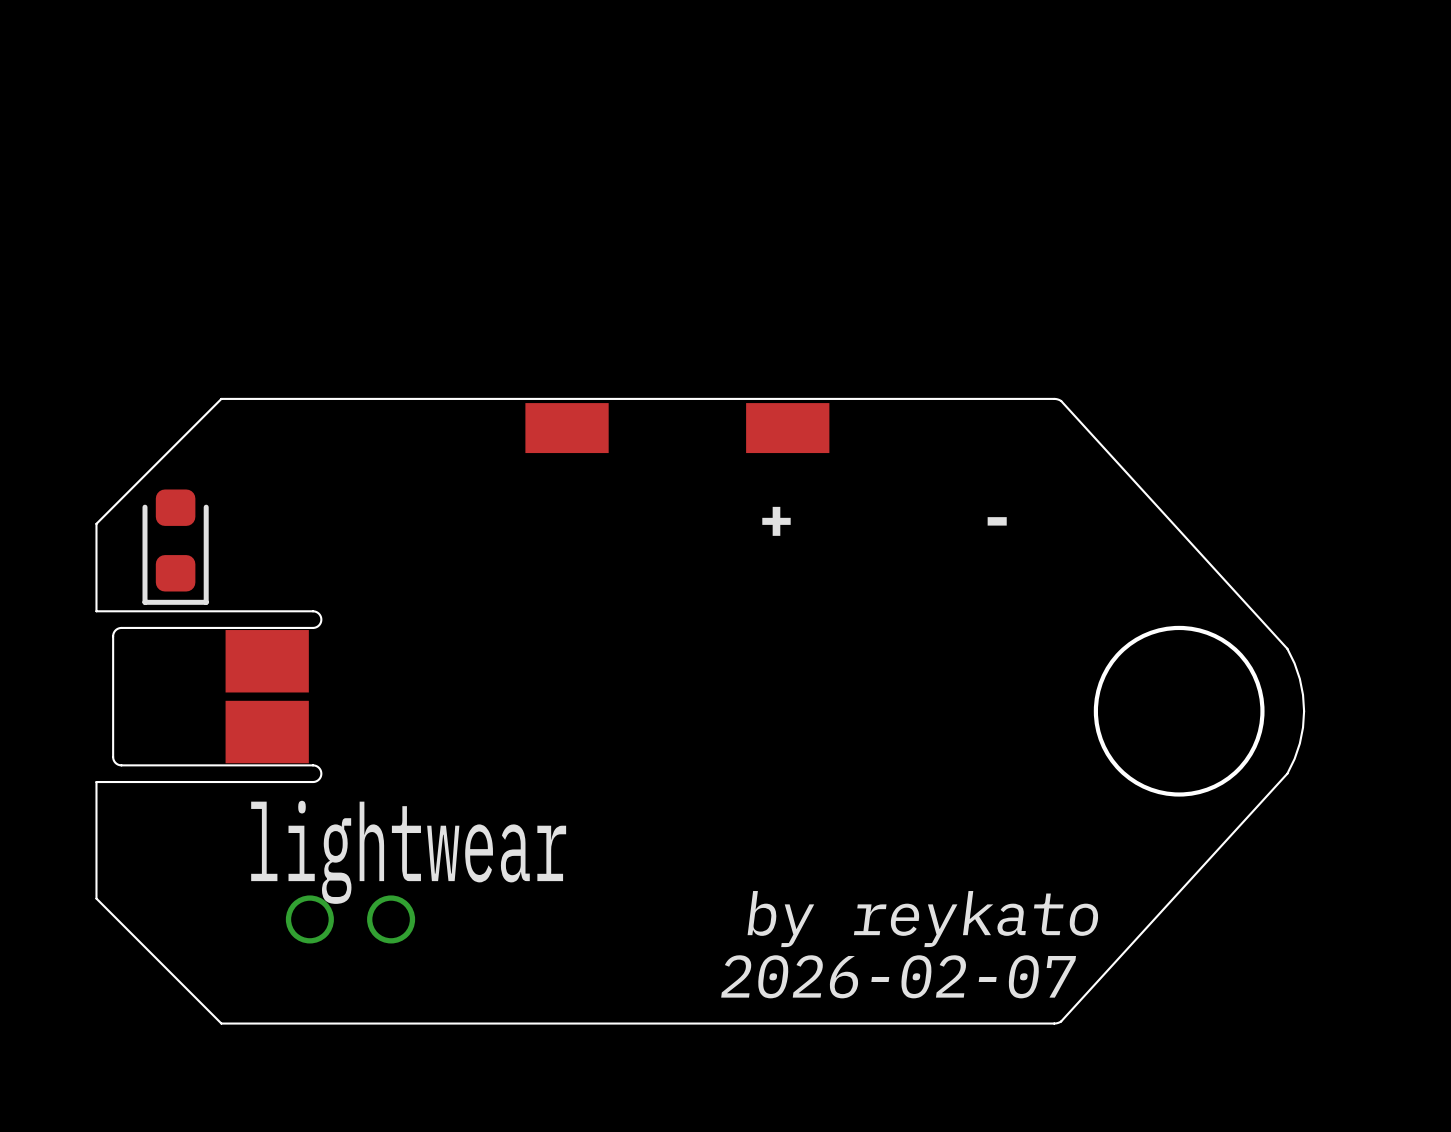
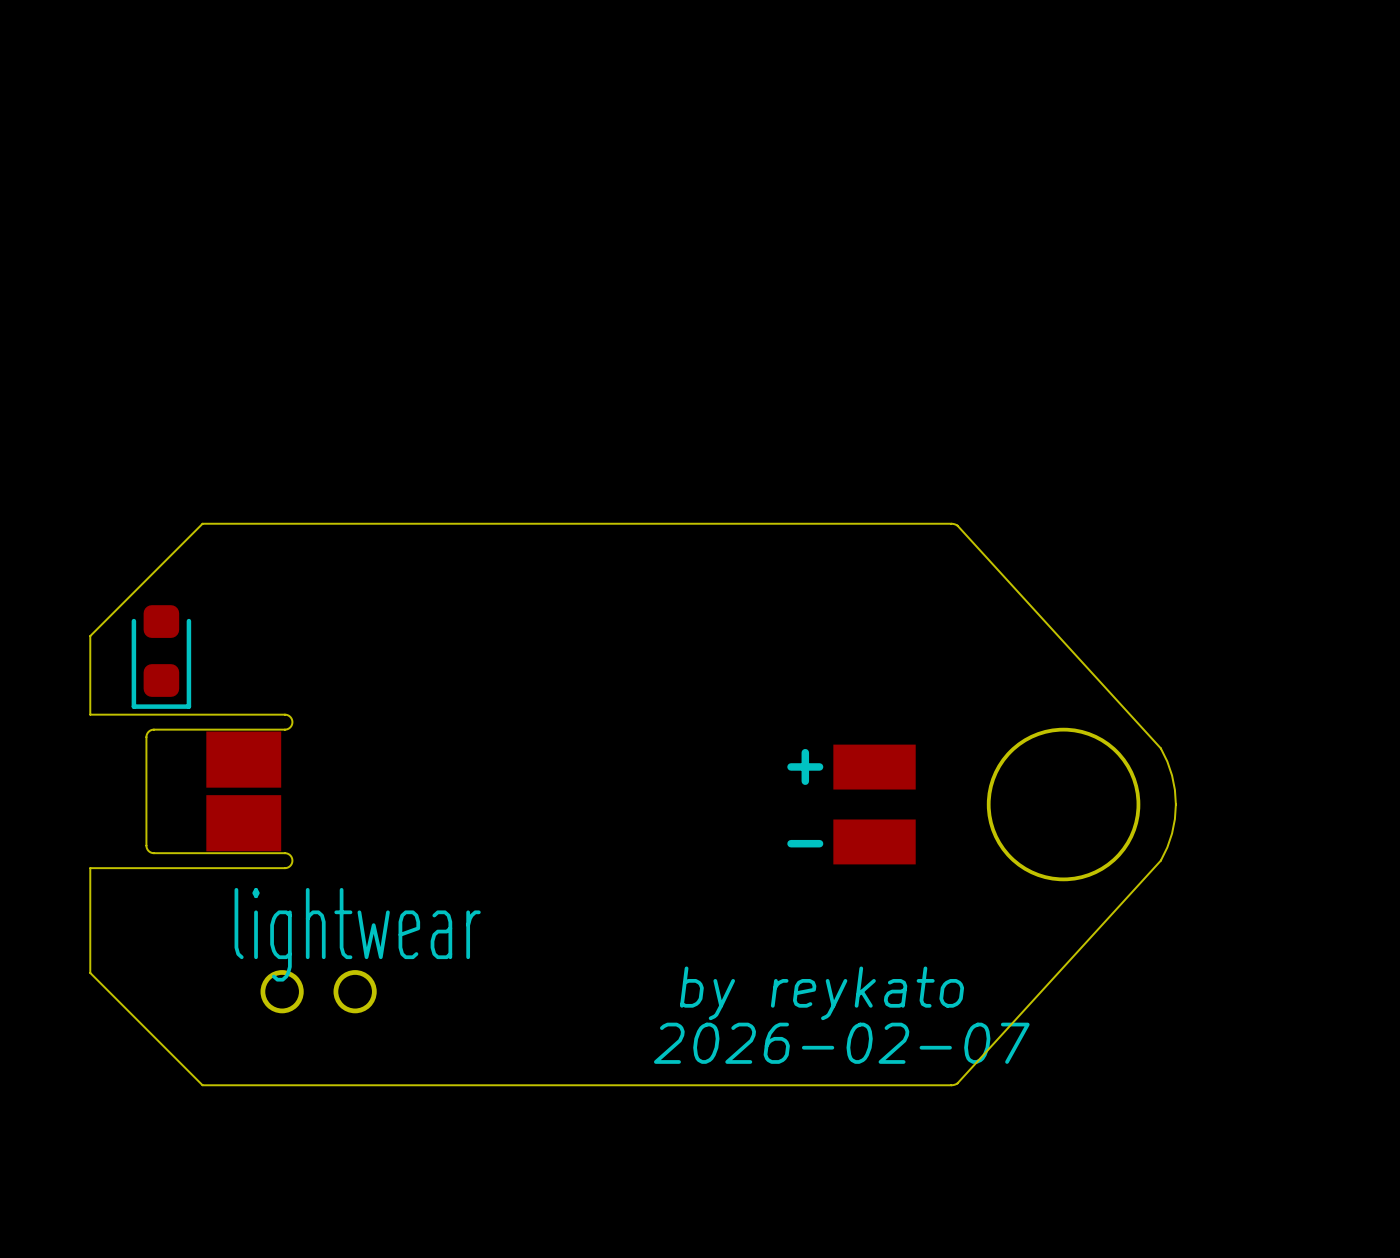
part: (567, 428) -> none
part: (787, 428) -> none
text: + (776, 521) -> none
text: - (997, 521) -> none
board edge: (167, 627) (120, 628) (114, 631) (113, 636) (113, 760) (120, 765) (167, 765) -> (153, 729) (148, 731) (146, 737) (146, 845) (148, 850) (153, 853)
part: none -> (874, 804)

